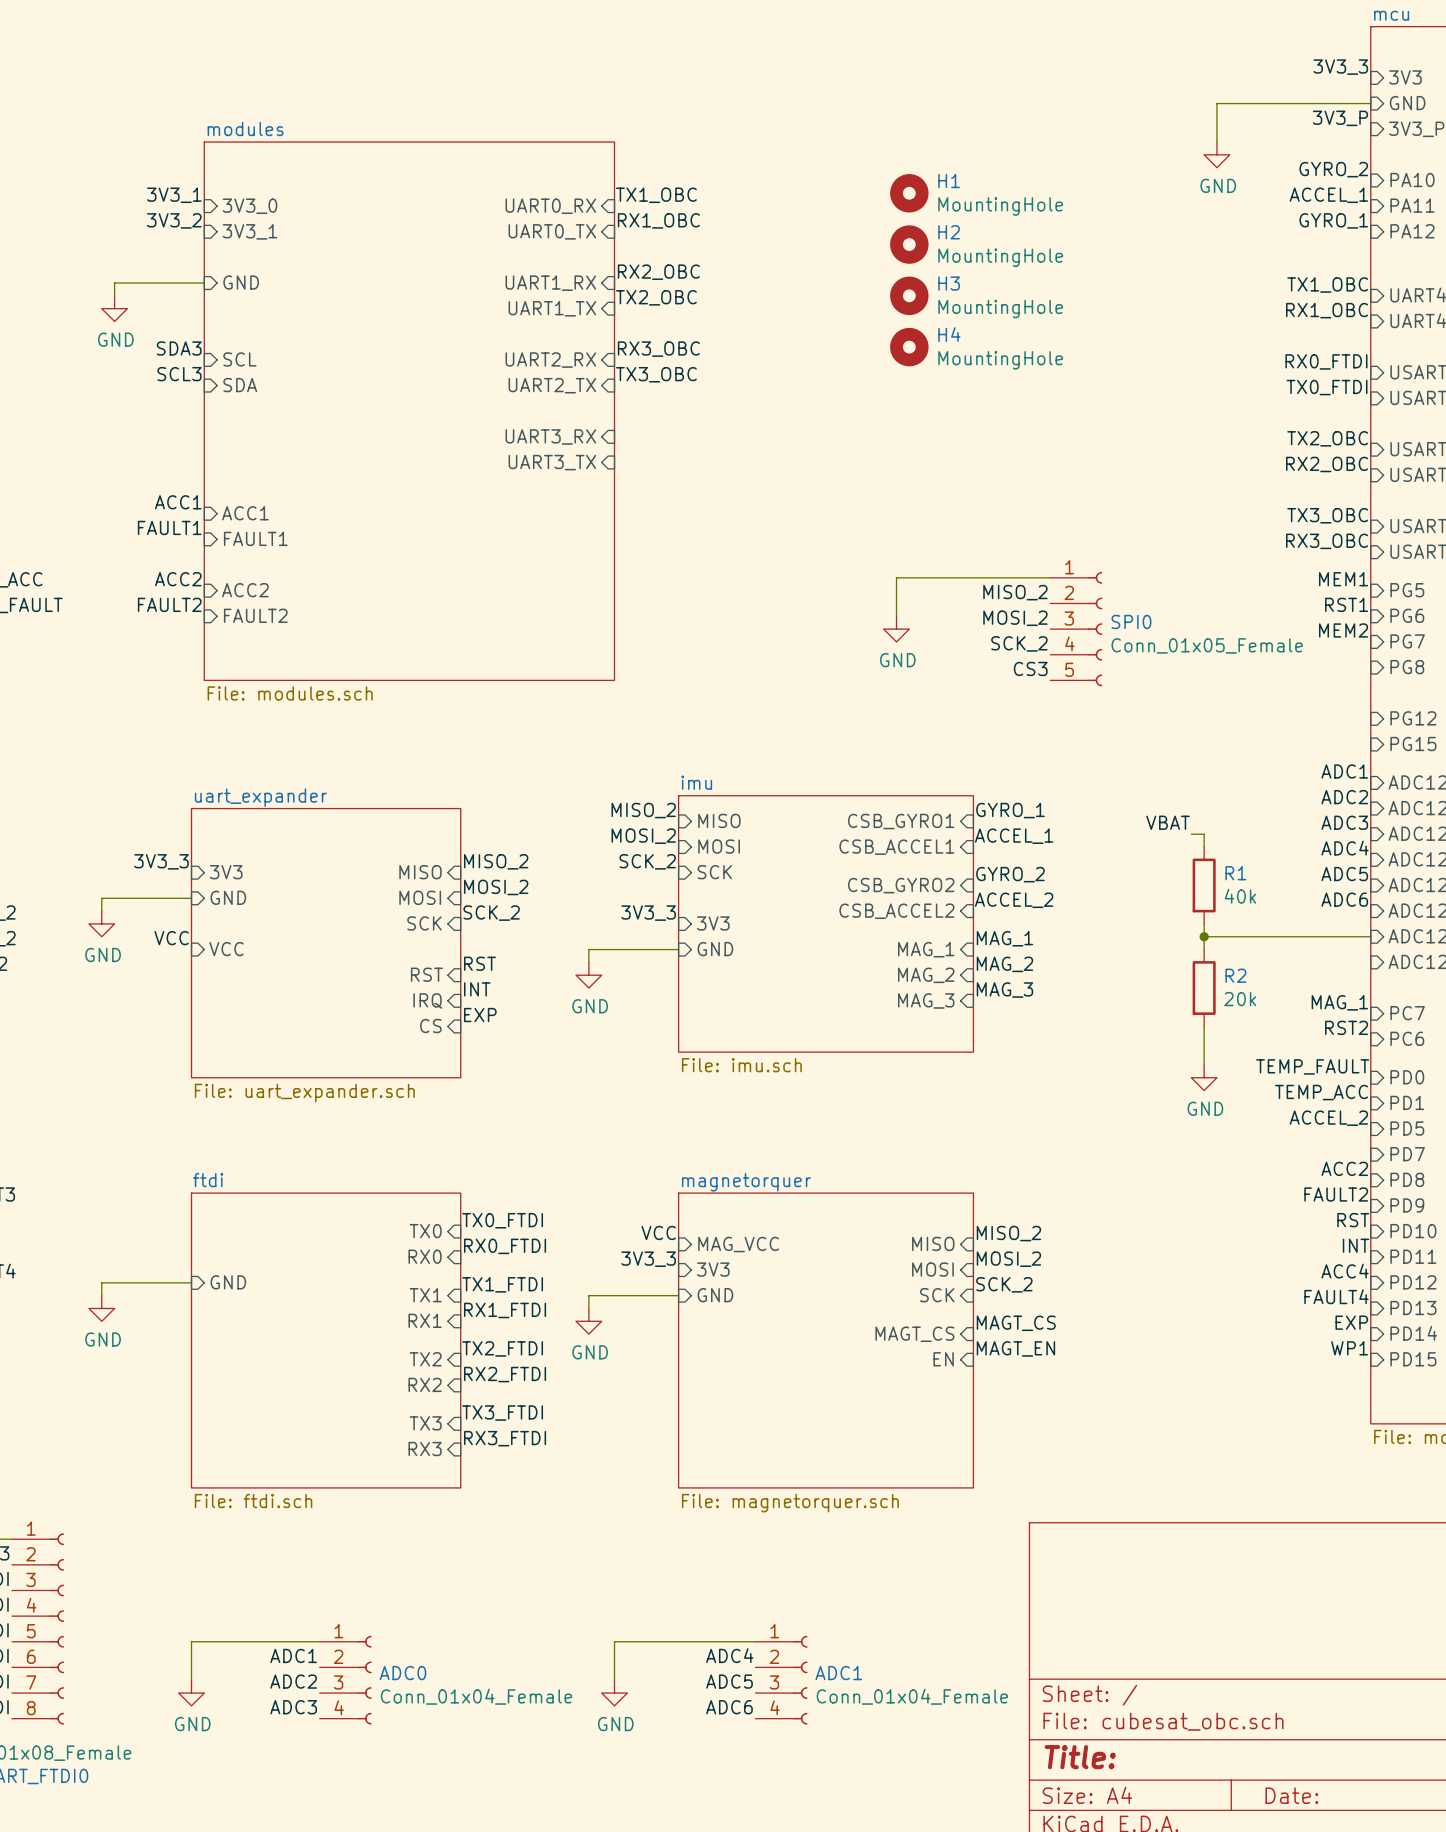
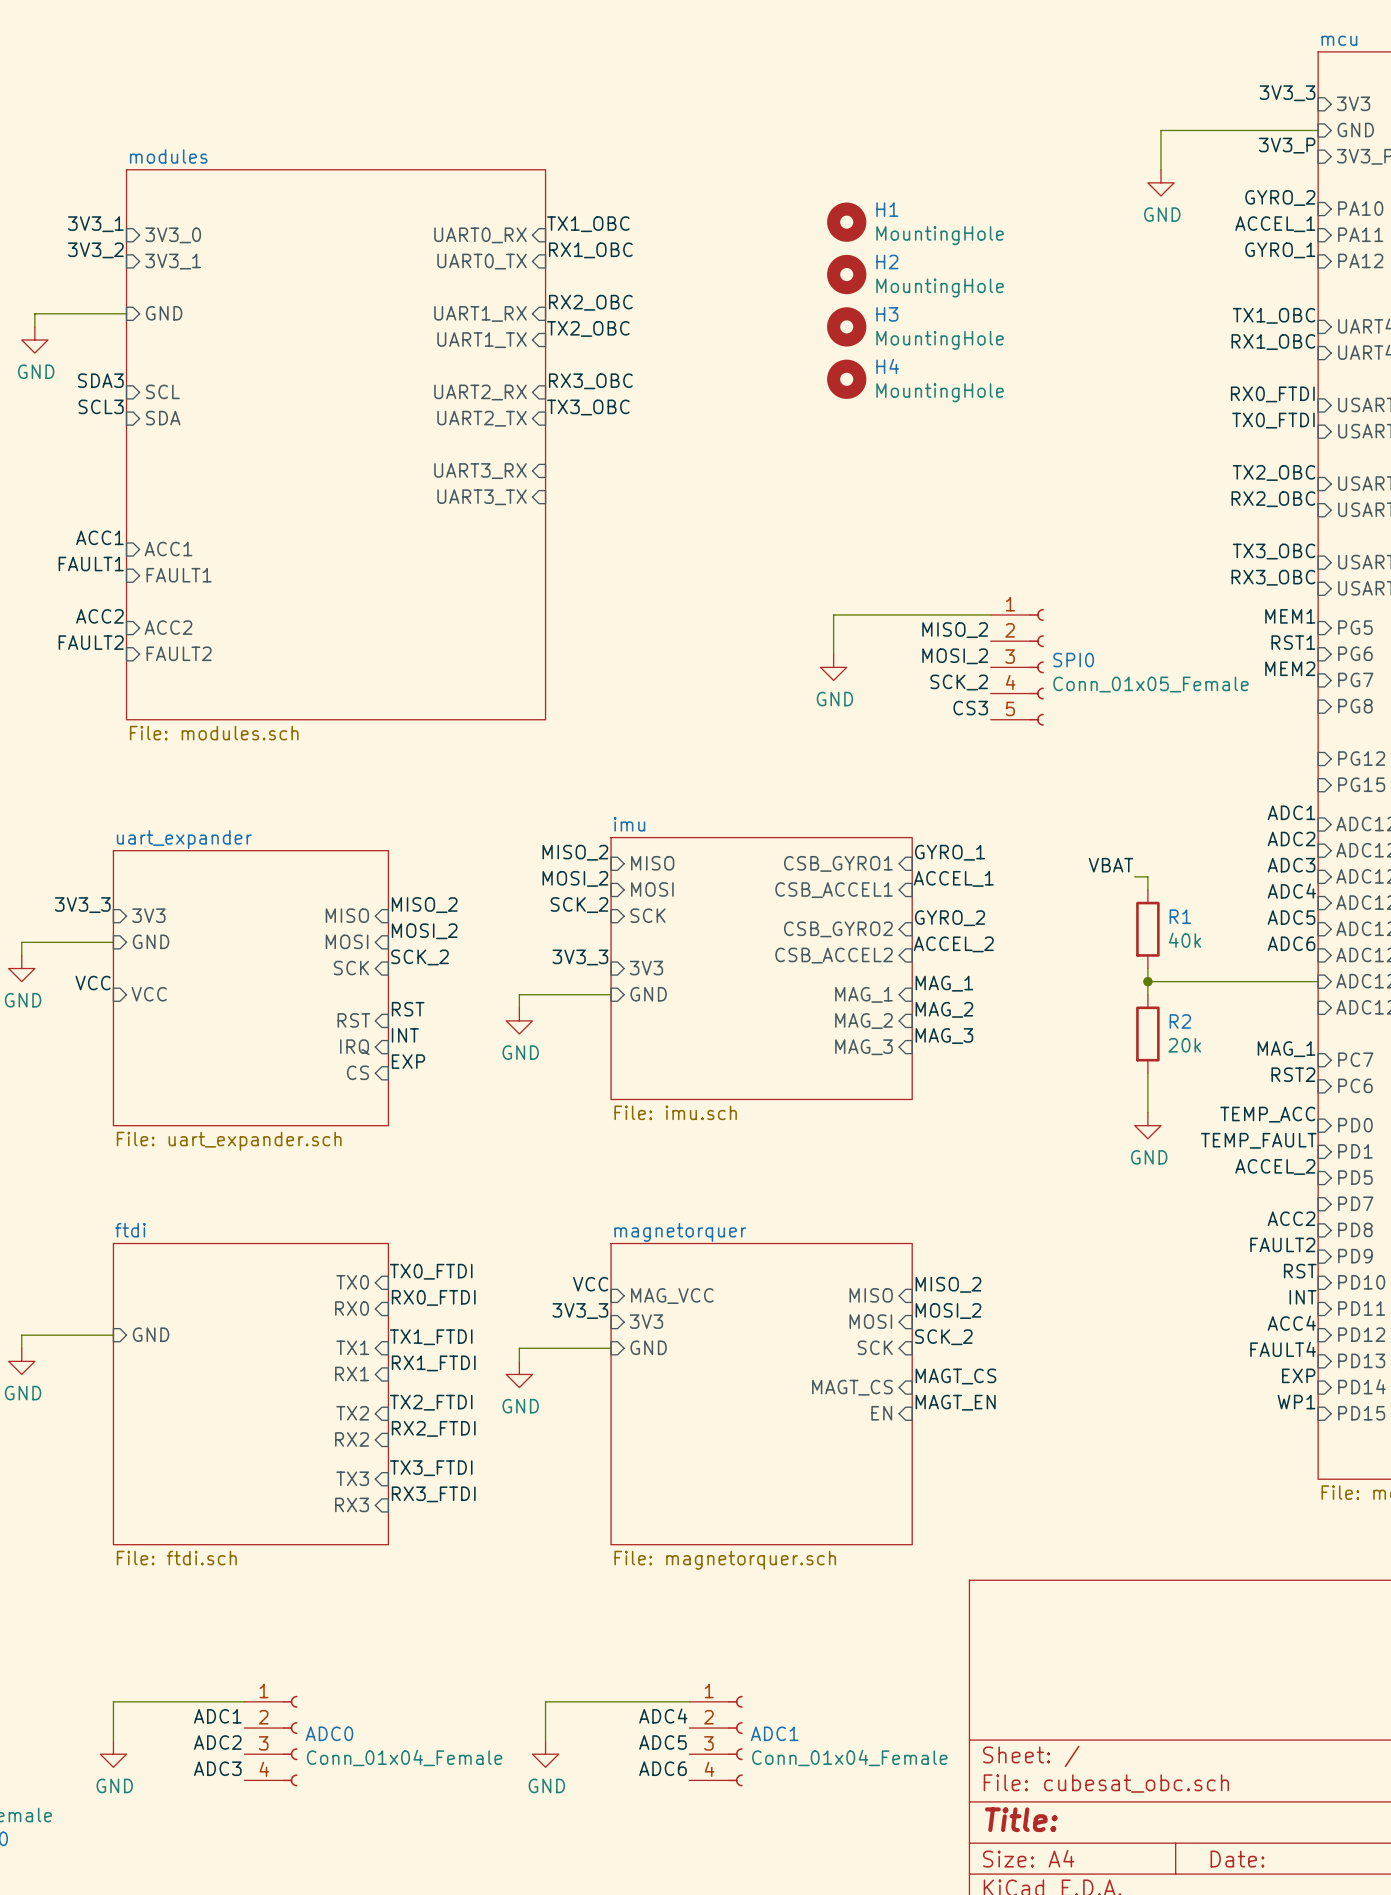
label: TEMP_FAULT (1312, 1066) -> TEMP_ACC (1267, 1114)
label: TEMP_ACC (1321, 1092) -> TEMP_FAULT (1258, 1140)

